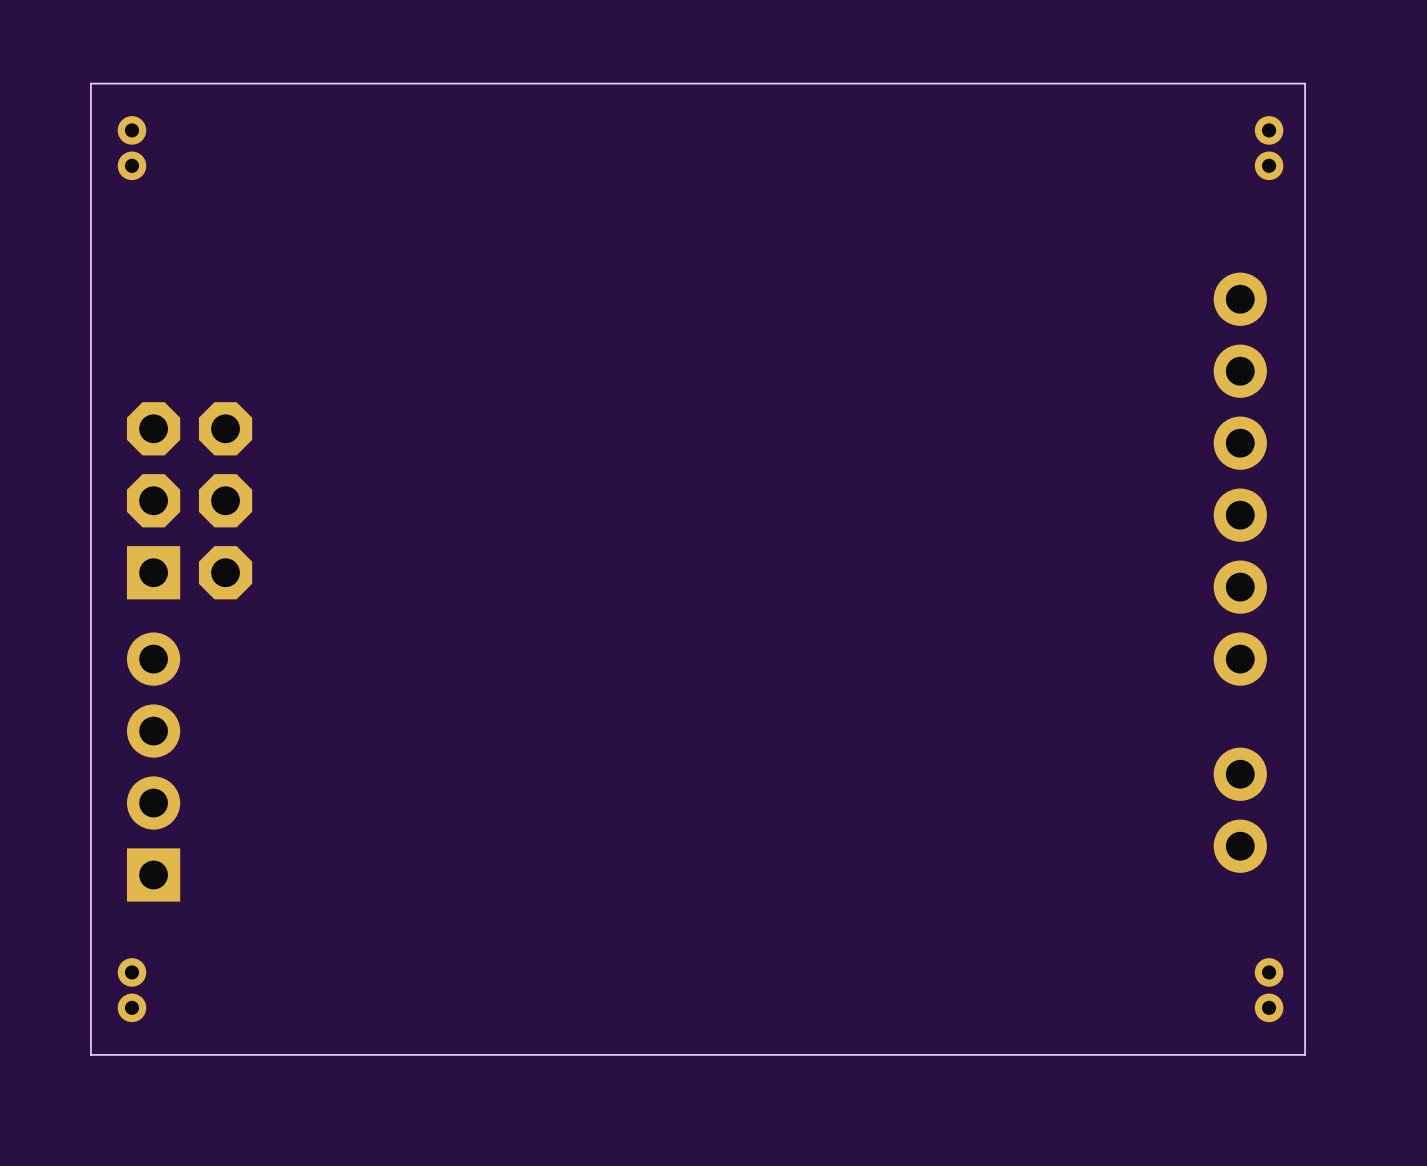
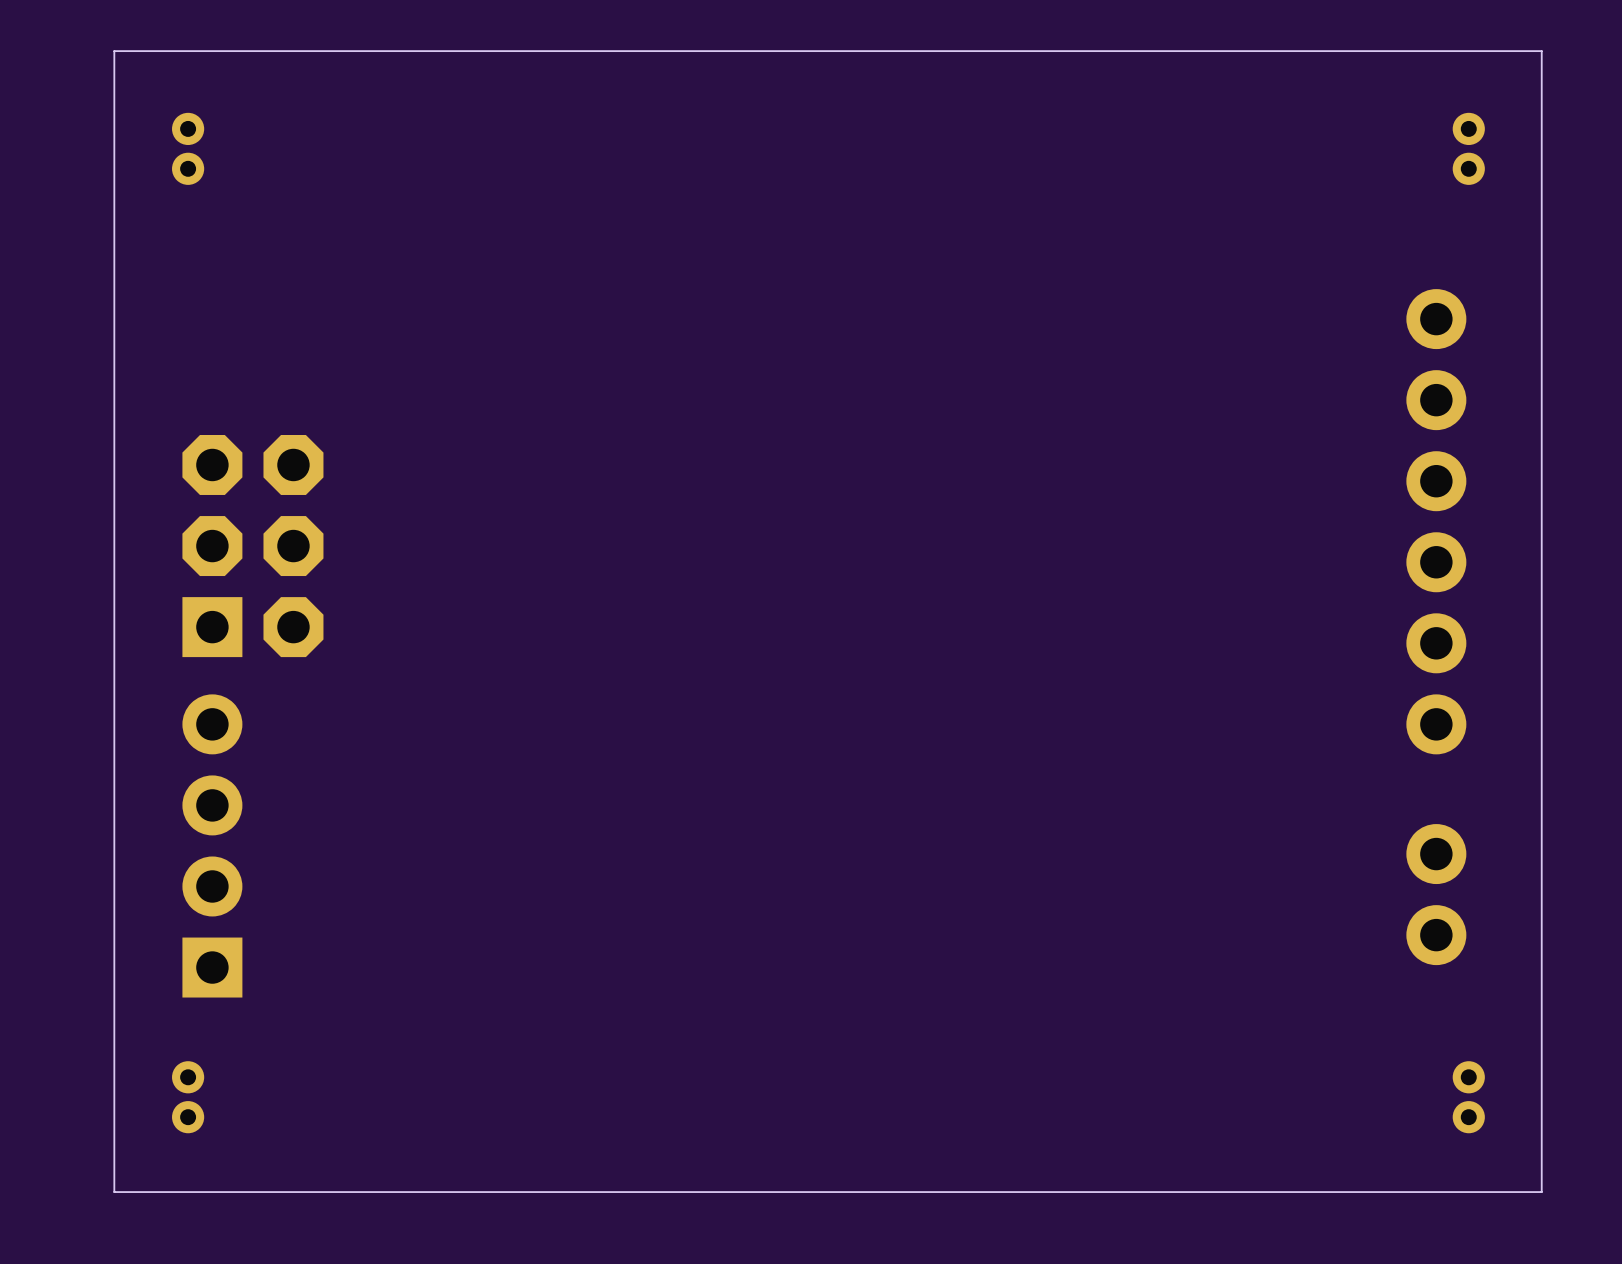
board edge: (1305, 83) (90, 83) (90, 1054) (1305, 1054) (1305, 83) -> (1541, 51) (1541, 1192) (114, 1192) (114, 51) (1541, 51)

